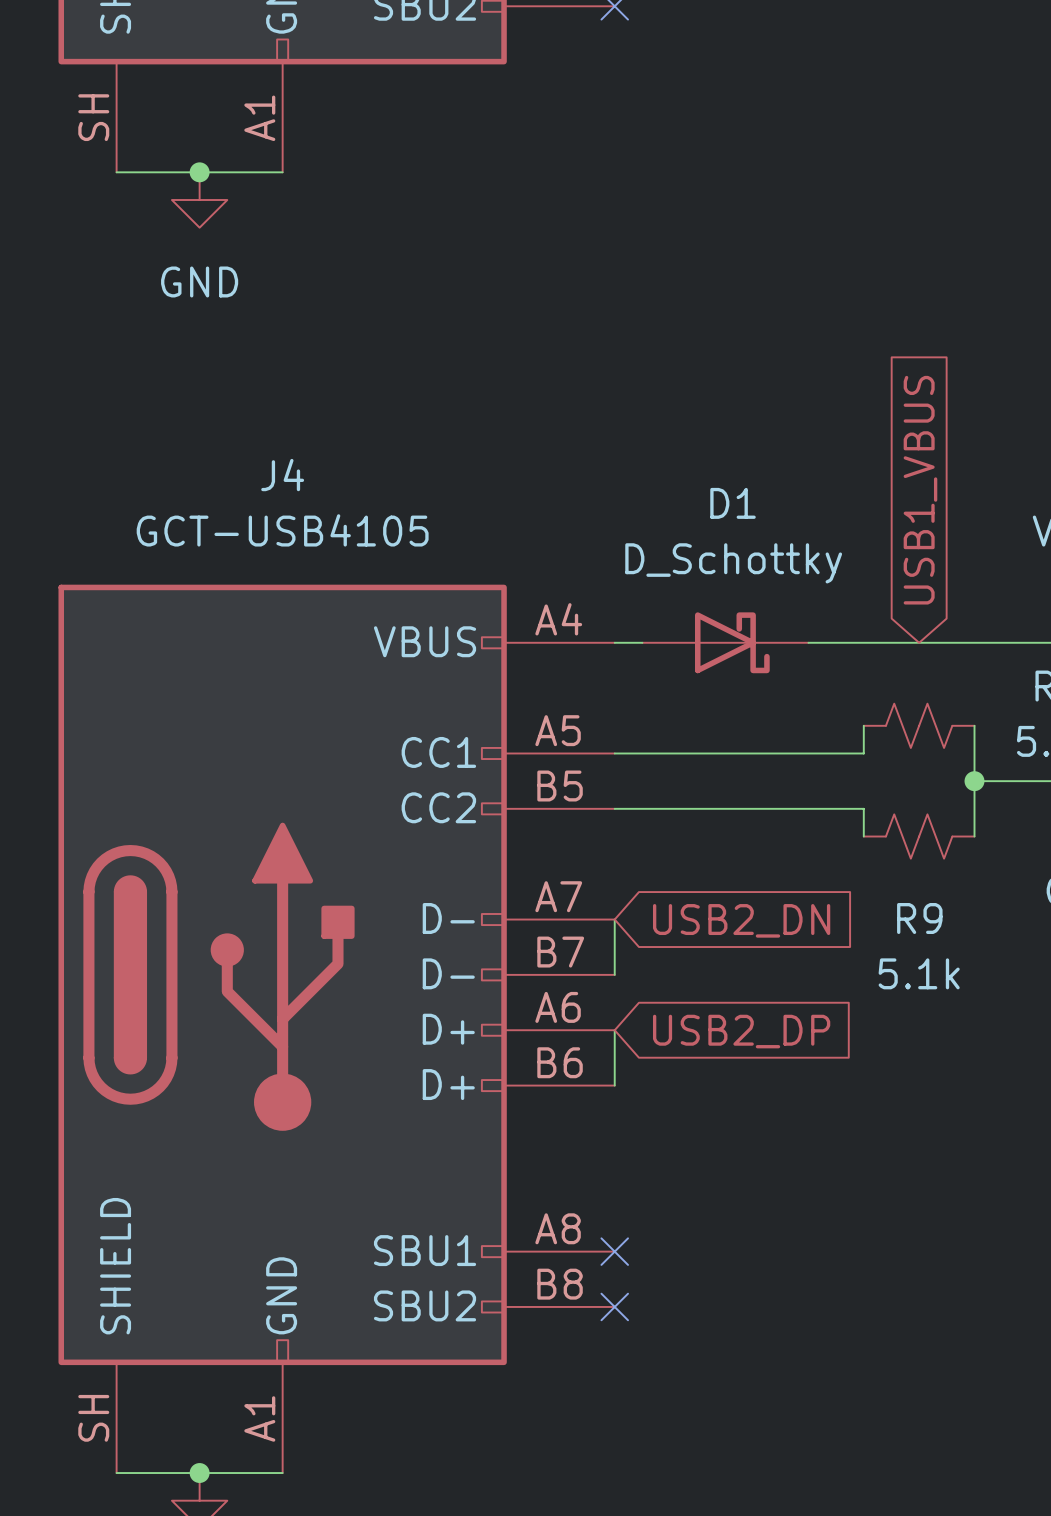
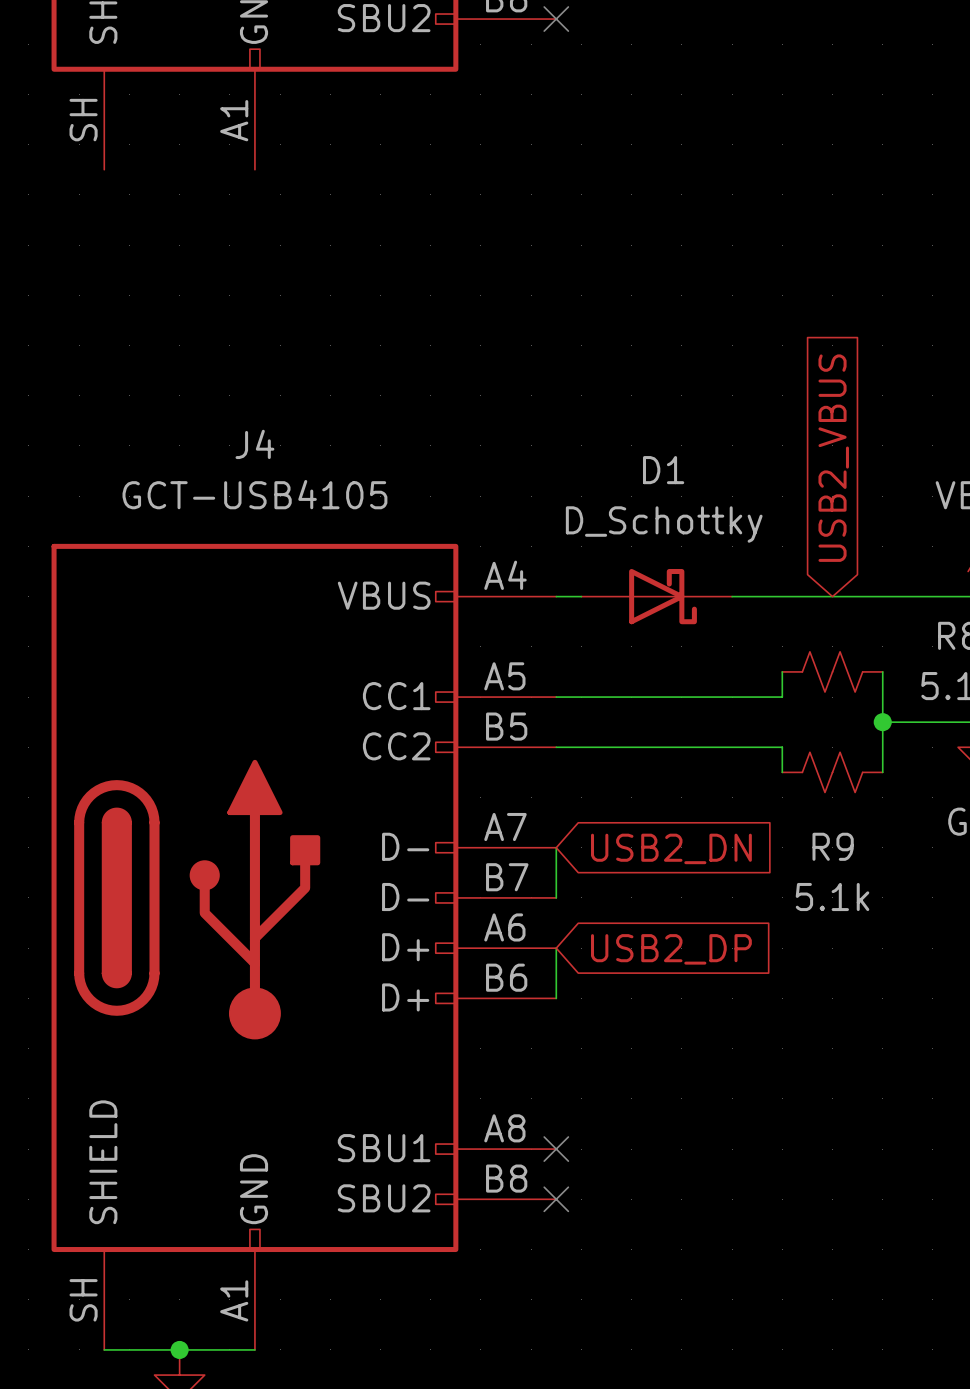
wire: (116, 172) (282, 172) -> none
junction: (199, 172) -> none
power symbol: GND (199, 200) -> none
global label: USB1_VBUS (920, 490) -> USB2_VBUS (833, 458)

